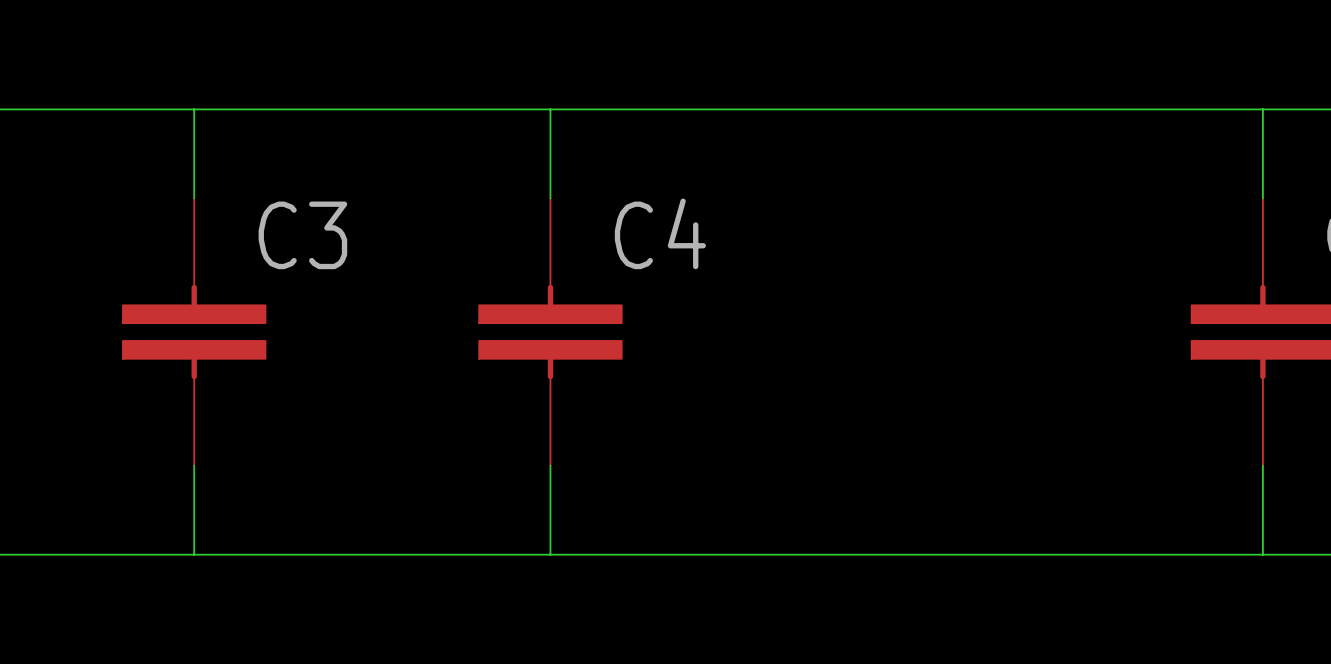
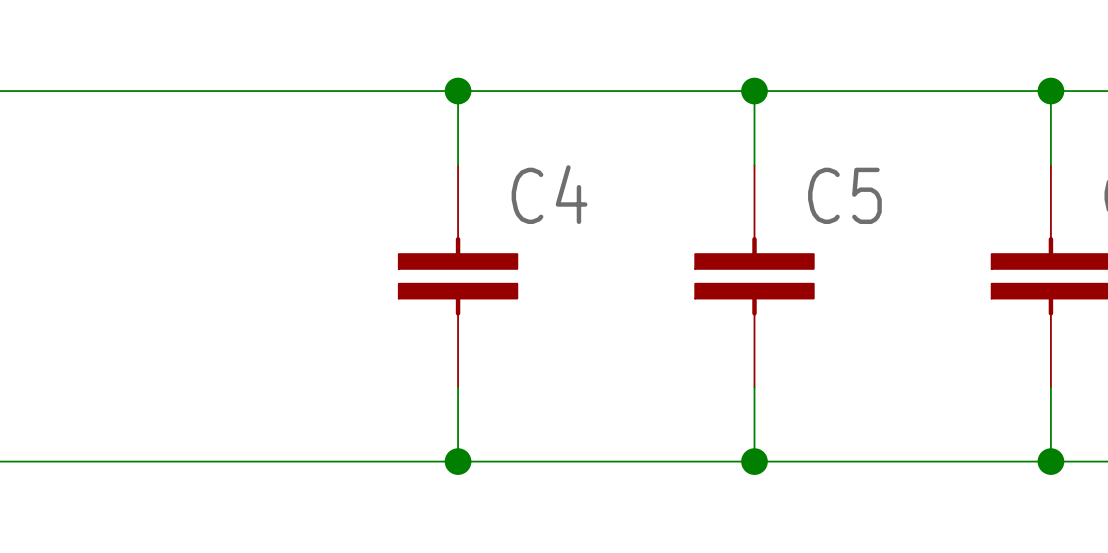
wire: (194, 109) (194, 198) -> (754, 91) (754, 165)
junction: none -> (458, 91)
junction: none -> (754, 91)
junction: none -> (1050, 91)
C3: (194, 332) -> none
C5: none -> (754, 276)
wire: (194, 465) (194, 554) -> (754, 387) (754, 461)
junction: none -> (458, 461)
junction: none -> (754, 461)
junction: none -> (1050, 461)

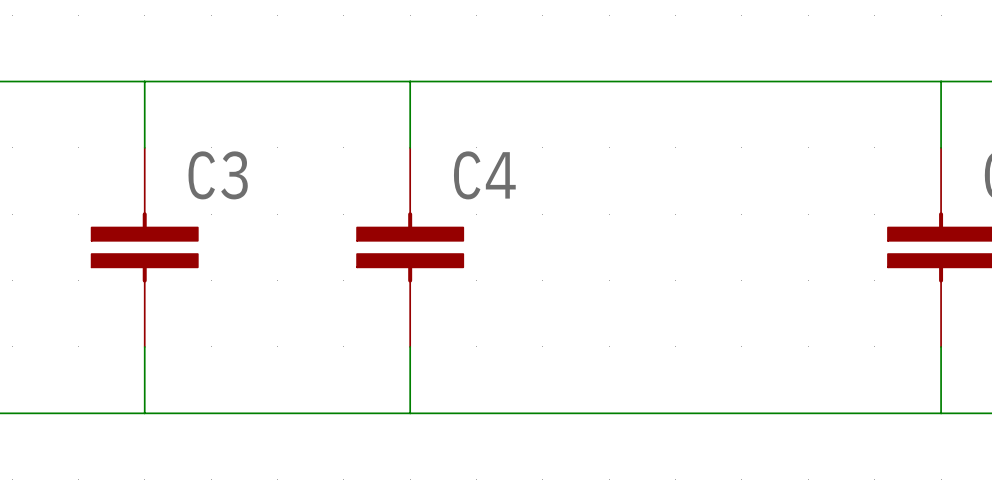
junction: (458, 91) -> none
wire: (754, 91) (754, 165) -> (144, 81) (144, 147)
junction: (754, 91) -> none
junction: (1050, 91) -> none
C3: none -> (144, 247)
C5: (754, 276) -> none
wire: (754, 387) (754, 461) -> (144, 346) (144, 413)
junction: (458, 461) -> none
junction: (754, 461) -> none
junction: (1050, 461) -> none

